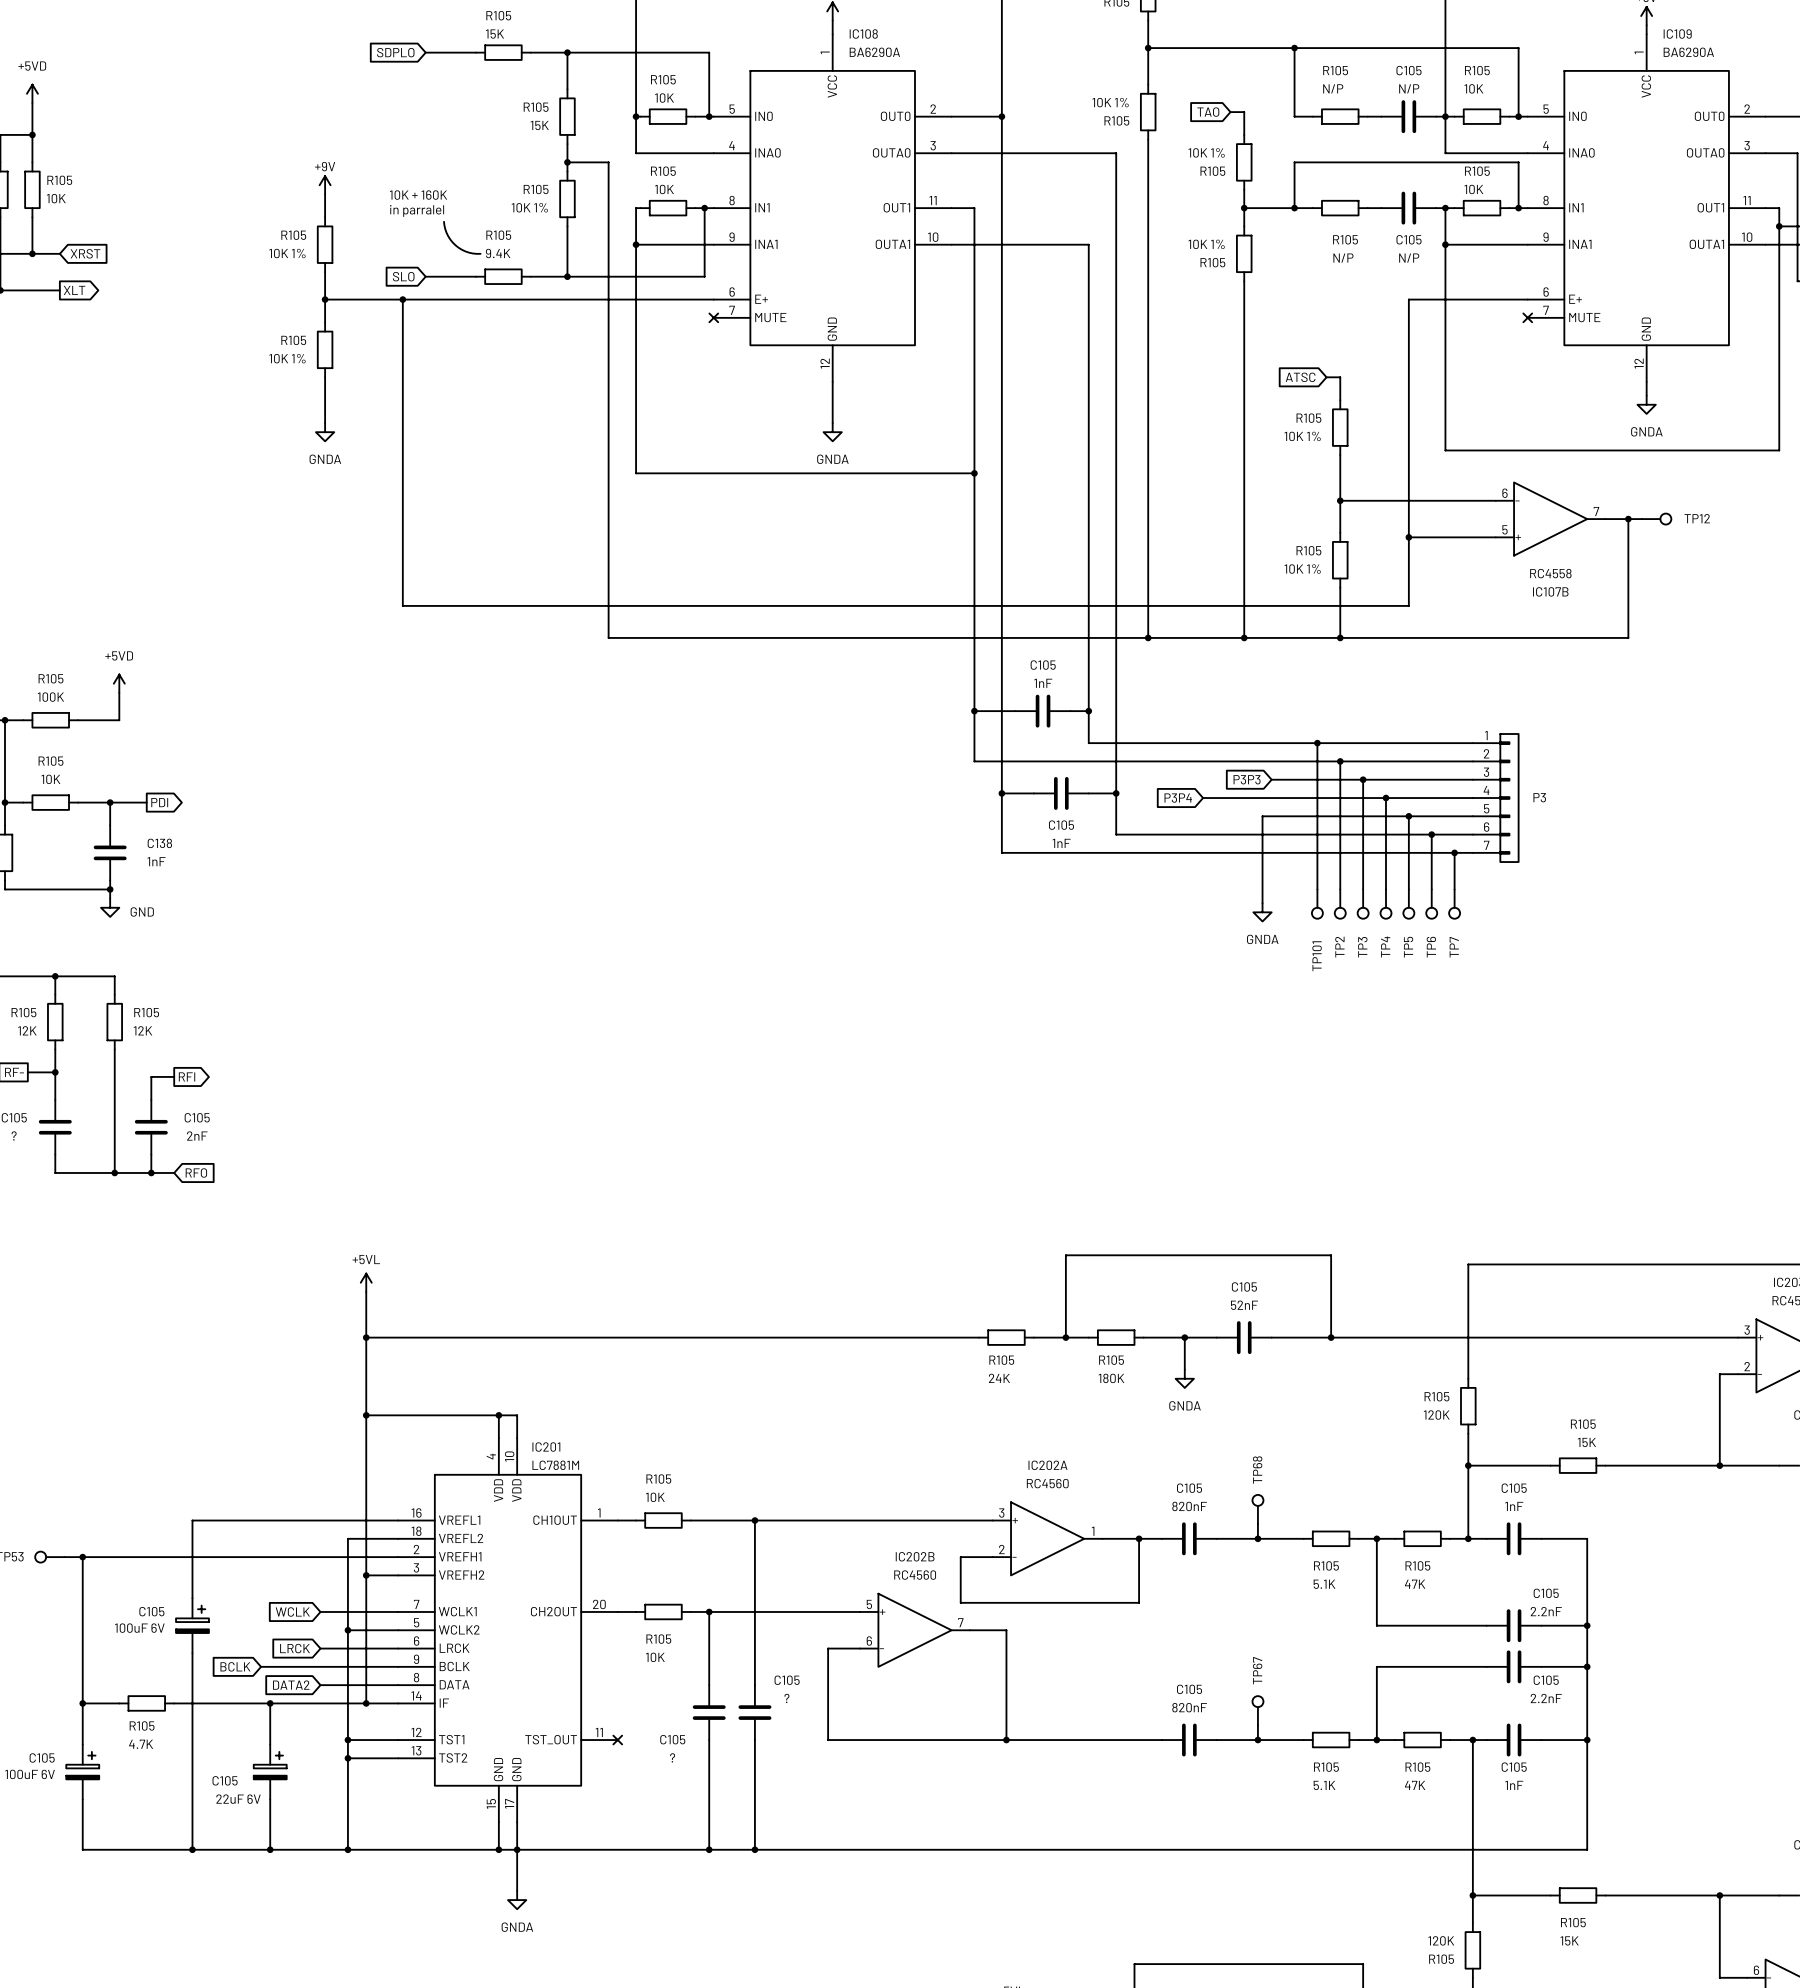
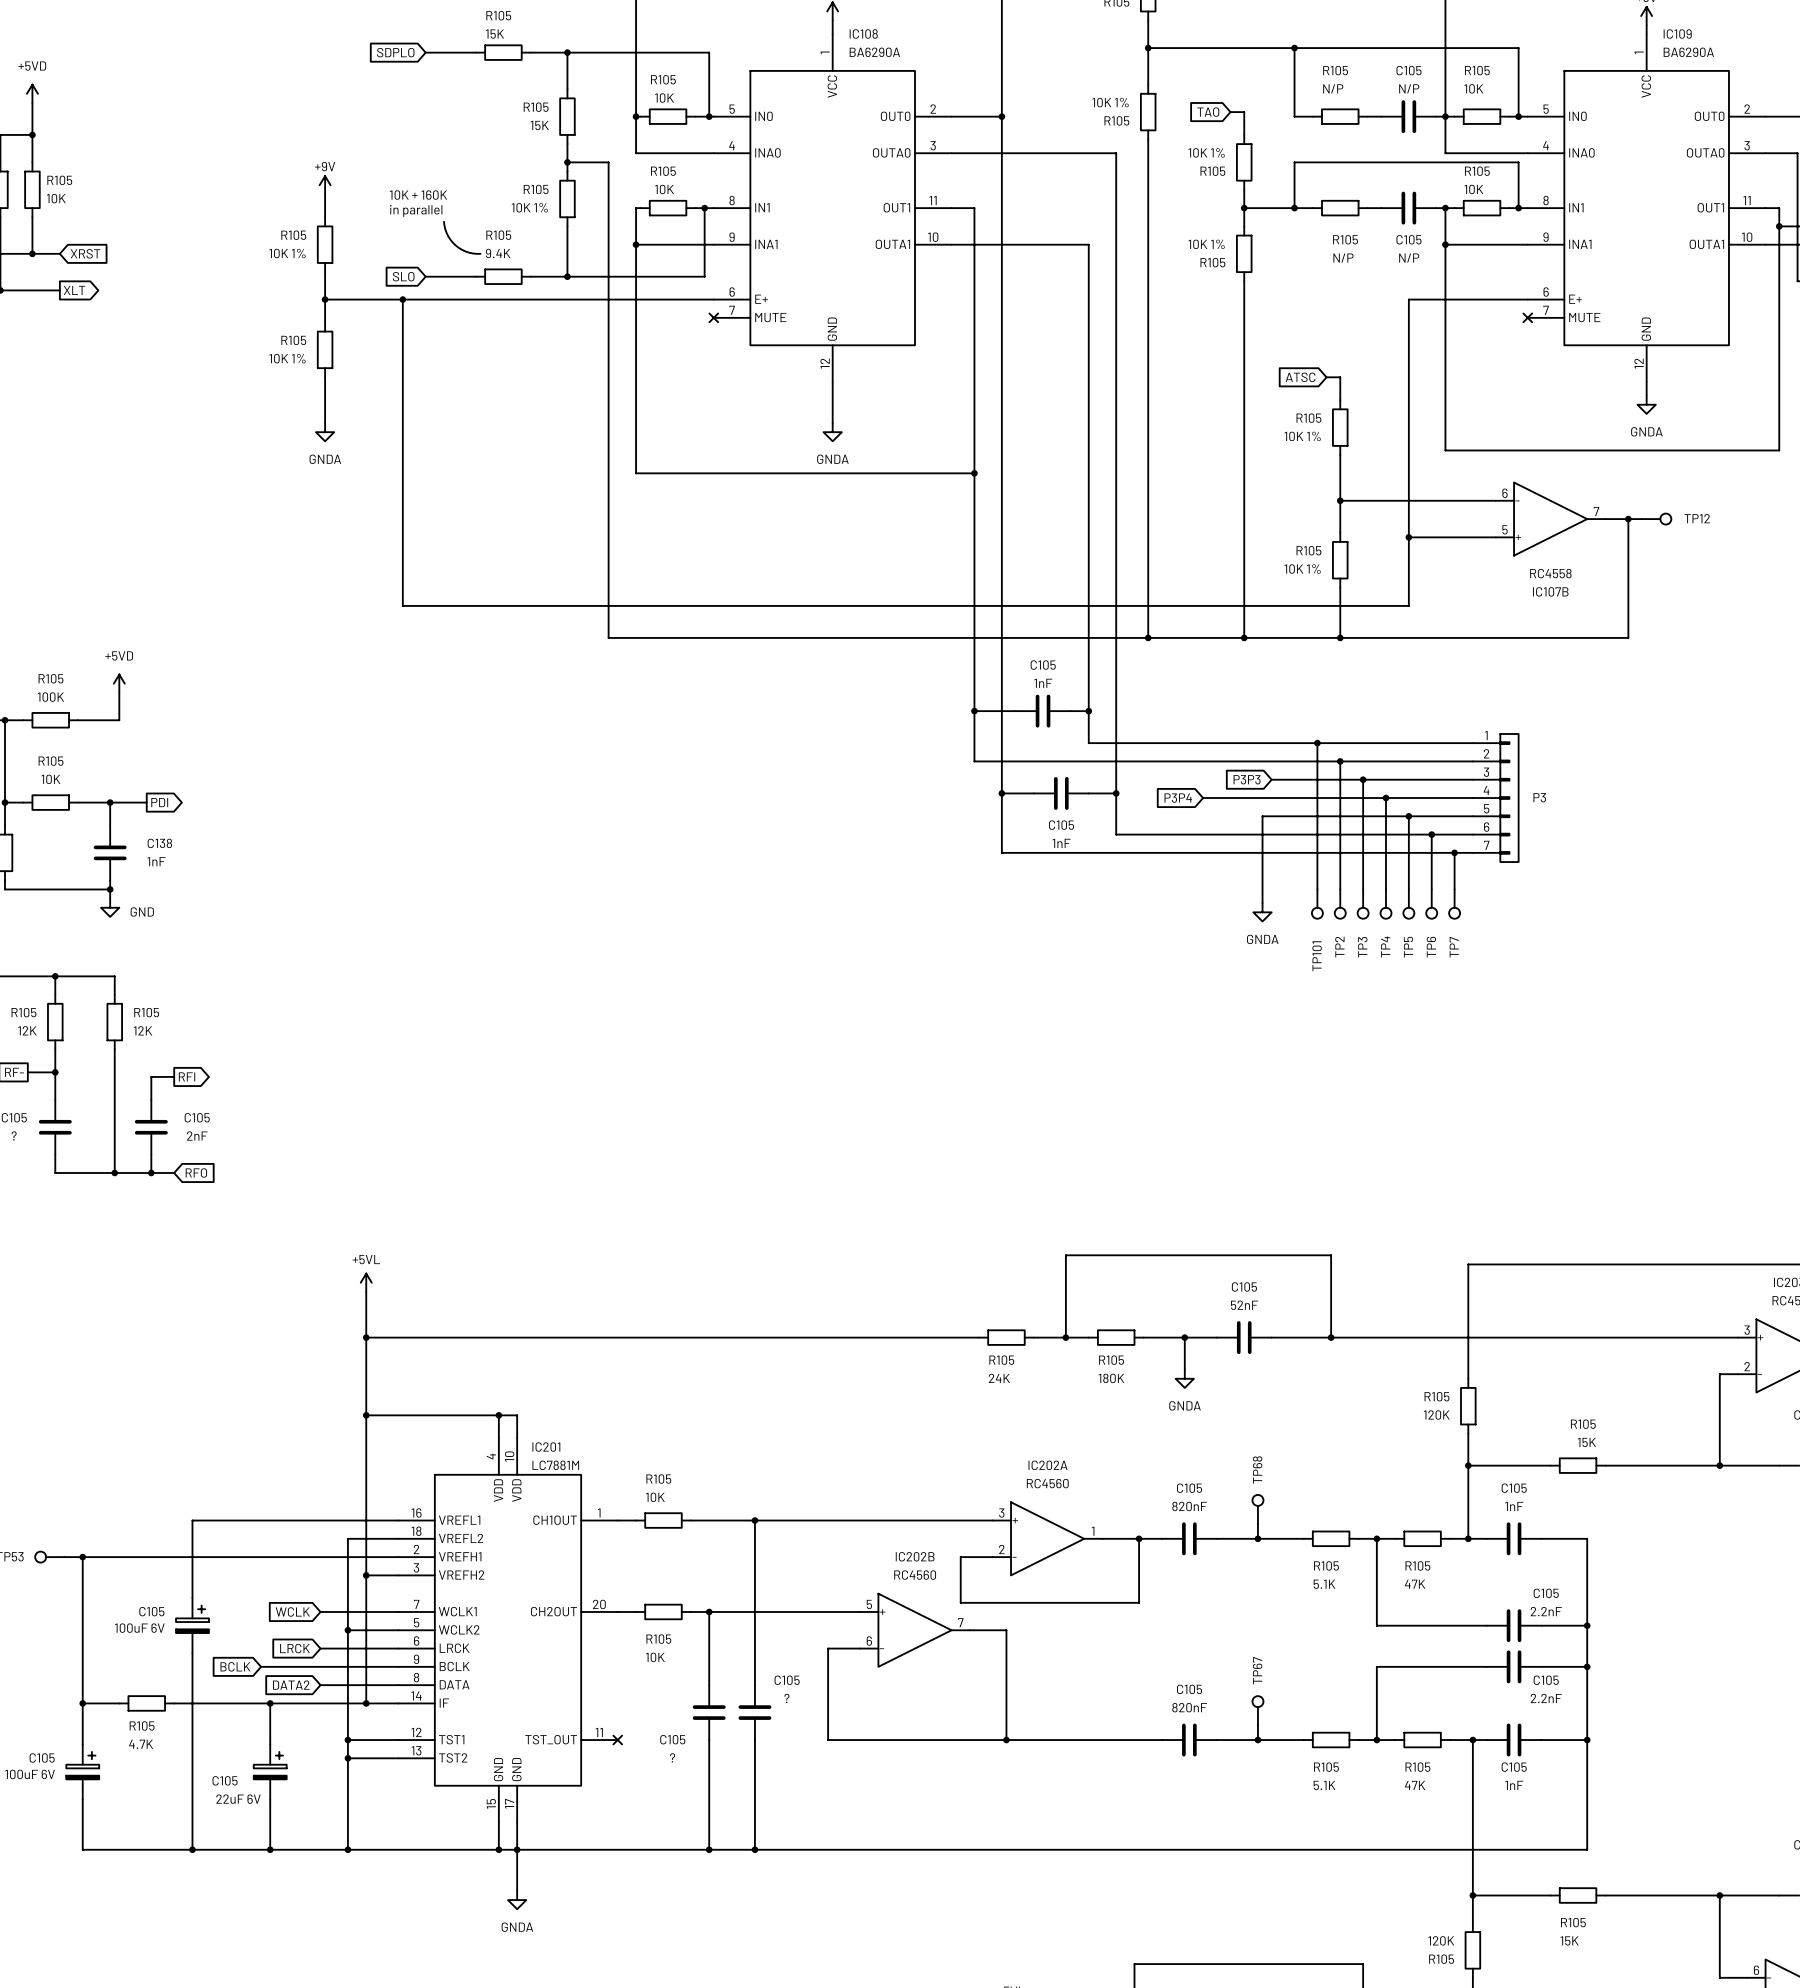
text: in parralel (417, 210) -> in parallel (416, 210)

